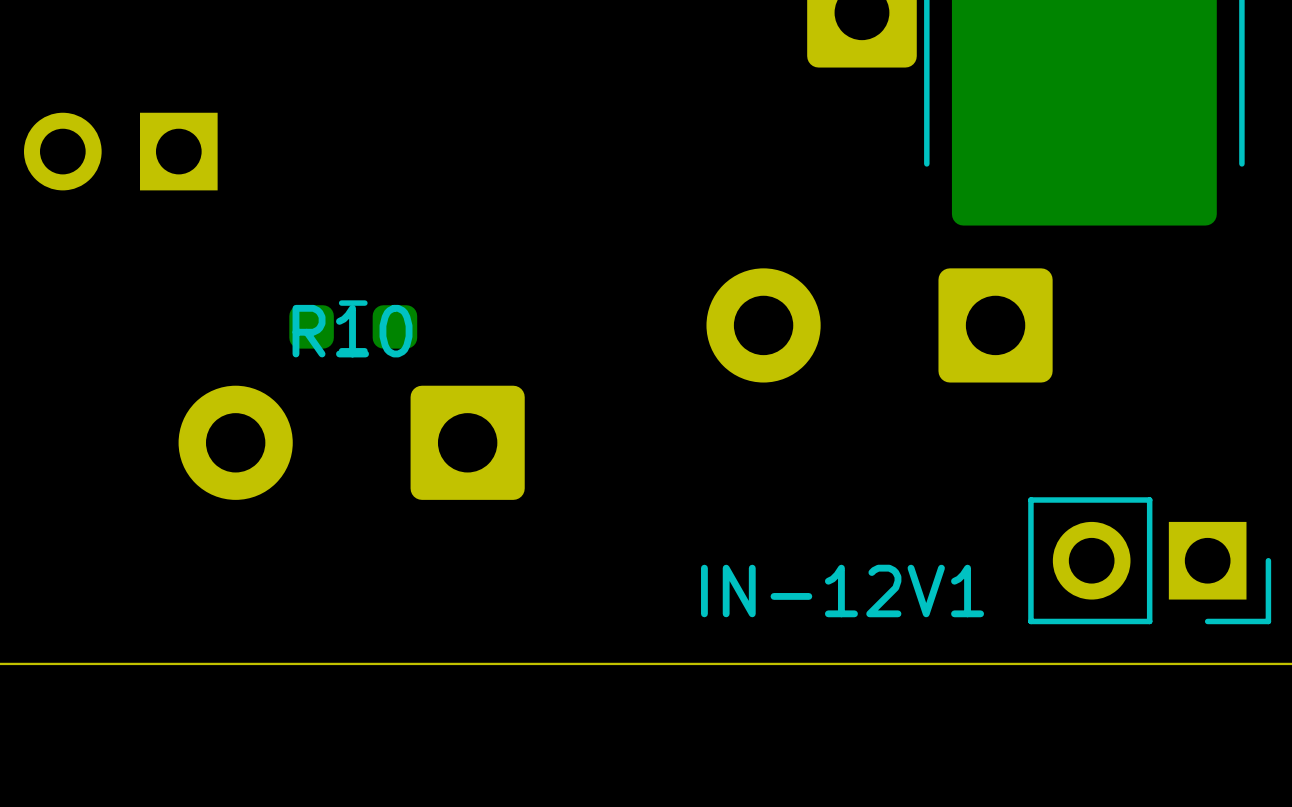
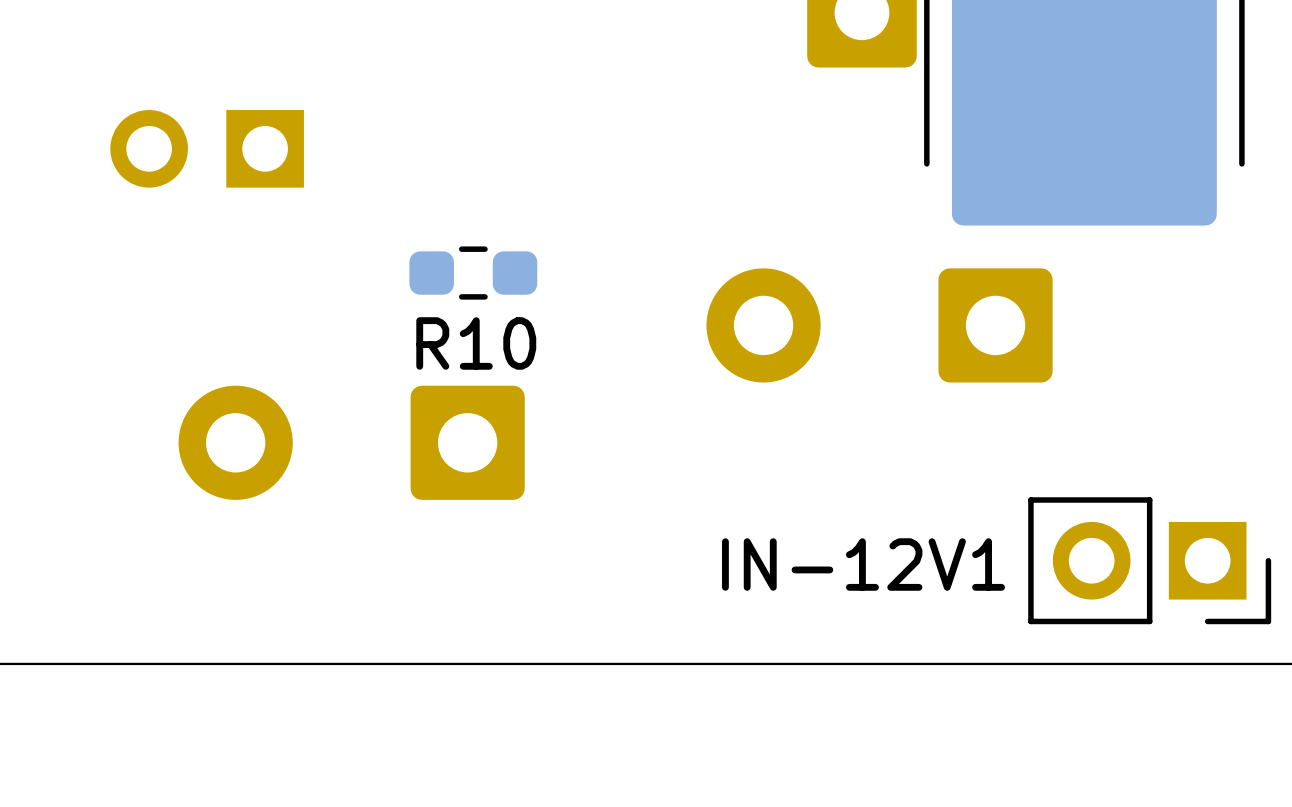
part position: (120, 151) -> (207, 148)
R10 position: (353, 326) -> (473, 273)
R10 name position: R10 (352, 331) -> R10 (476, 343)
IN-12V1 name position: IN-12V1 (842, 590) -> IN-12V1 (863, 564)

